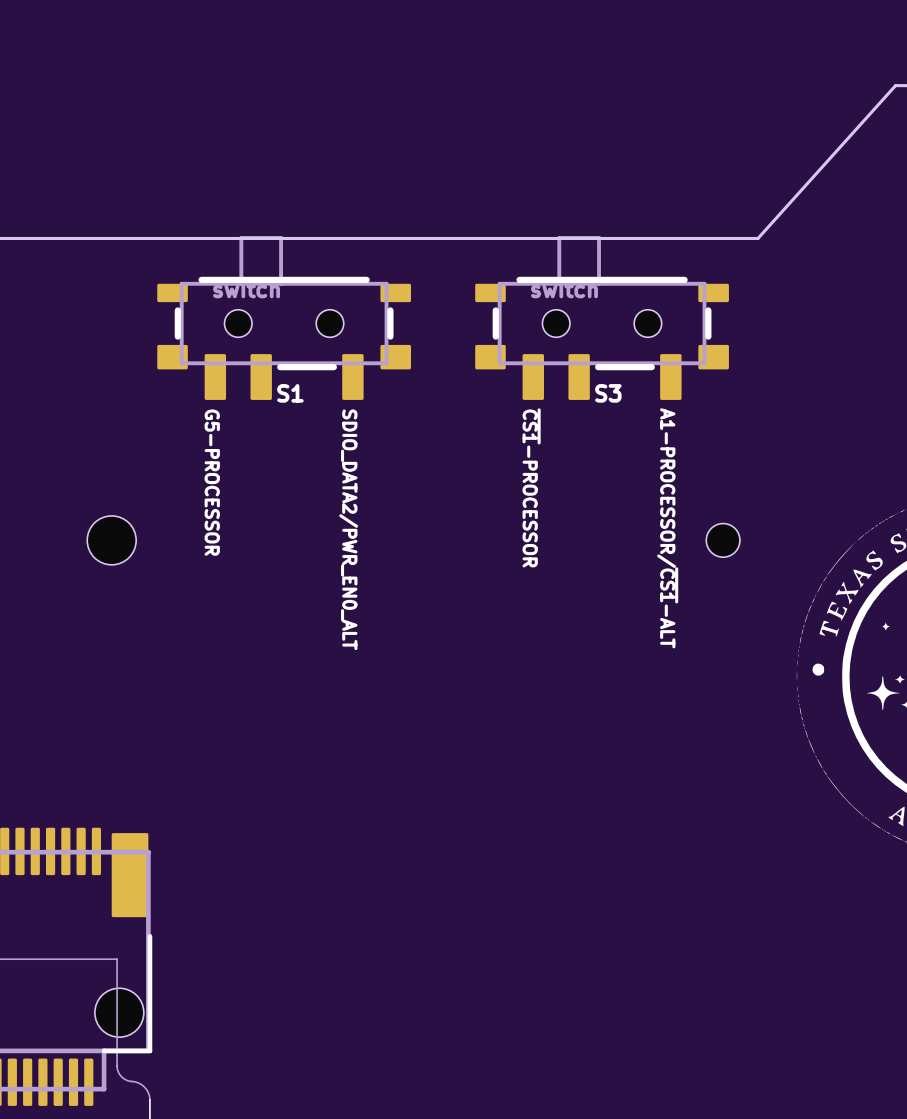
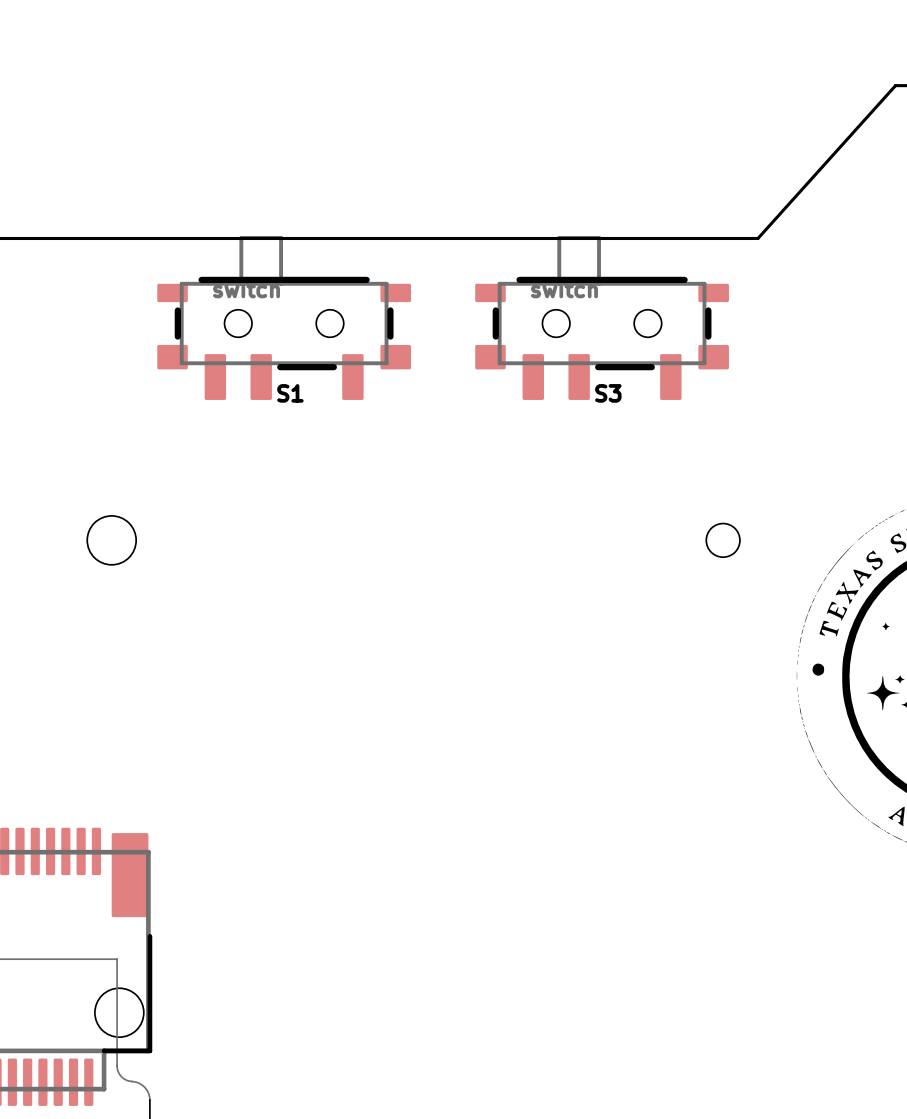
text: G5-PROCESSOR (212, 482) -> none
text: ~{CS1}-PROCESSOR (531, 487) -> none
text: A1-PROCESSOR/~{CS1}-ALT (667, 528) -> none
text: SDIO_DATA2/PWR_EN0_ALT (348, 529) -> none

